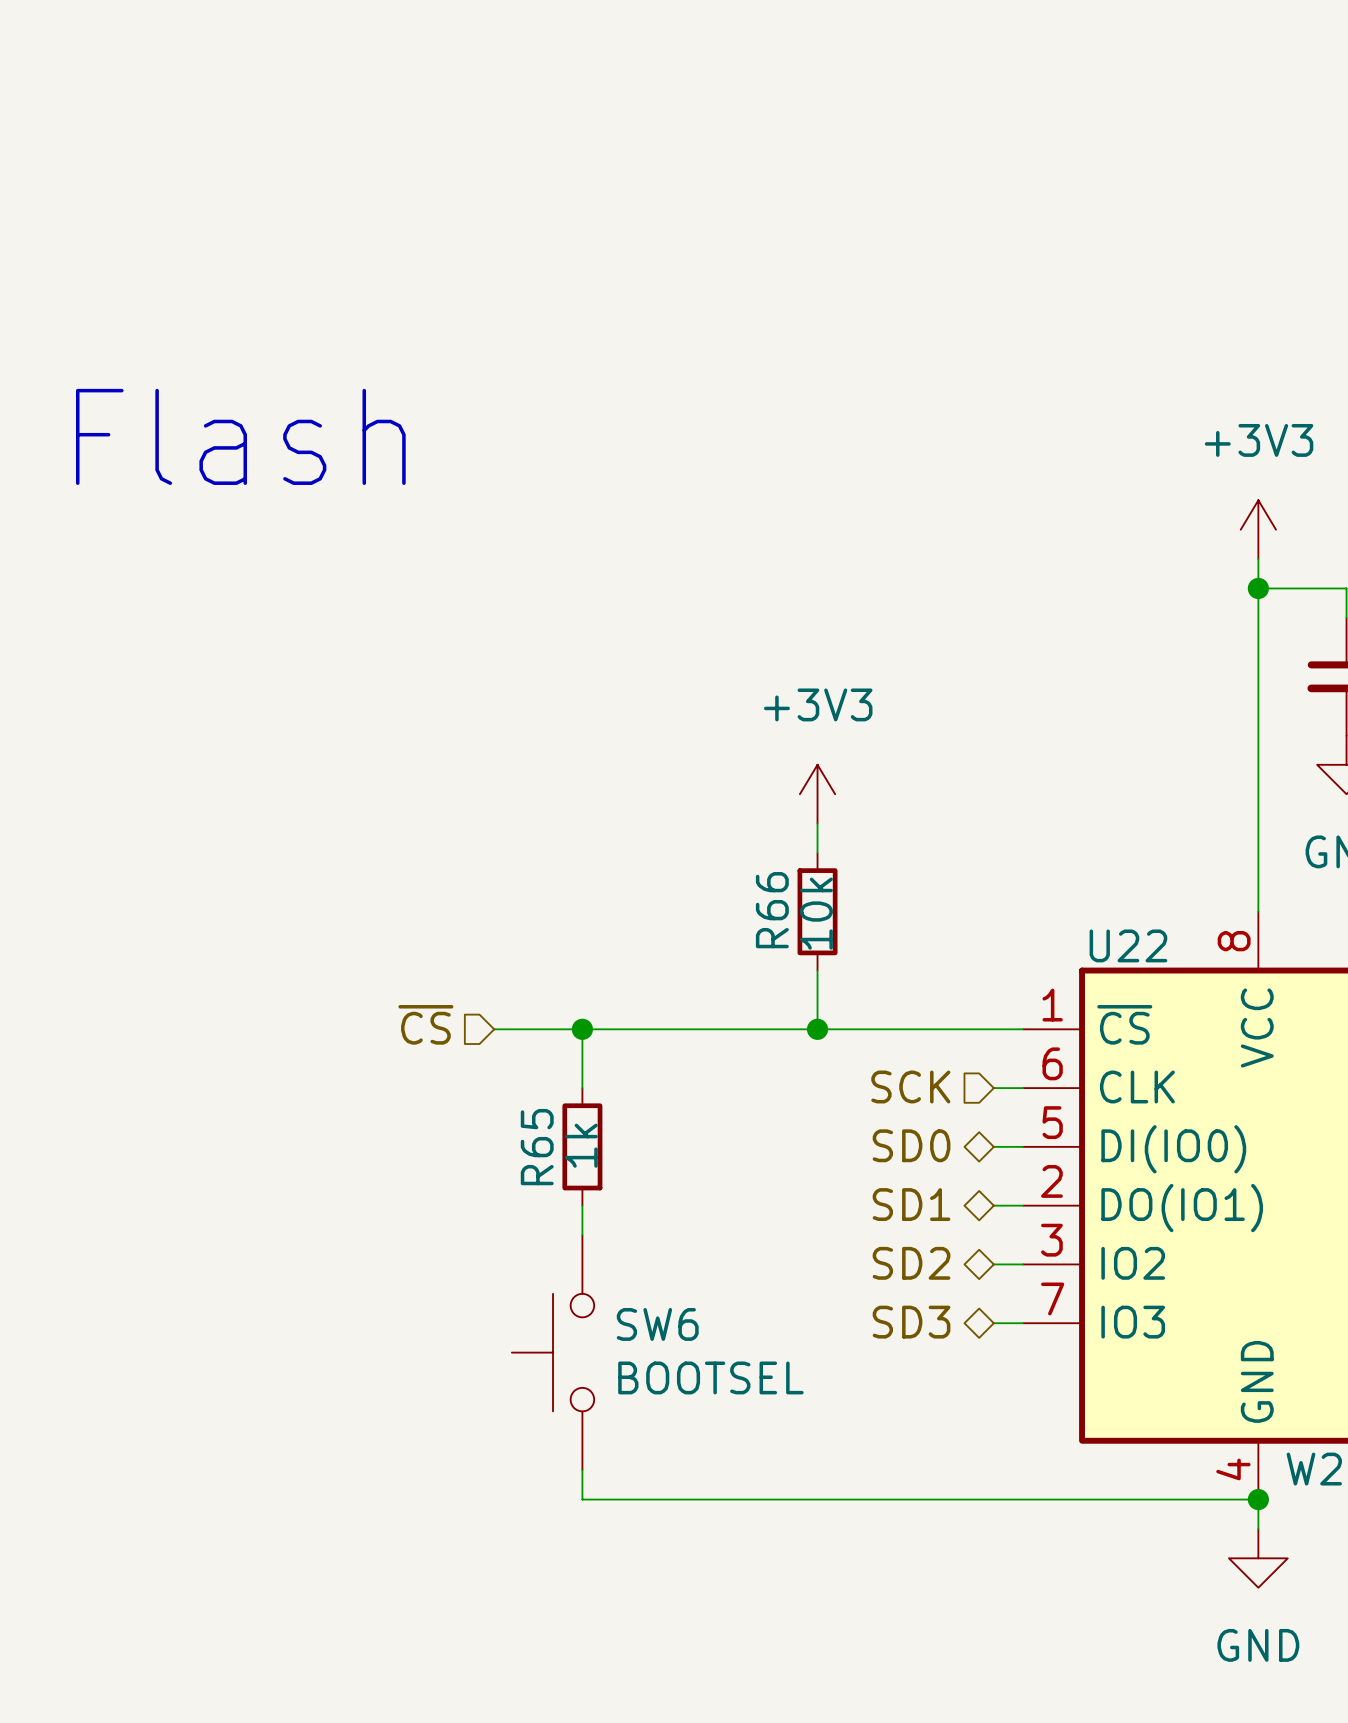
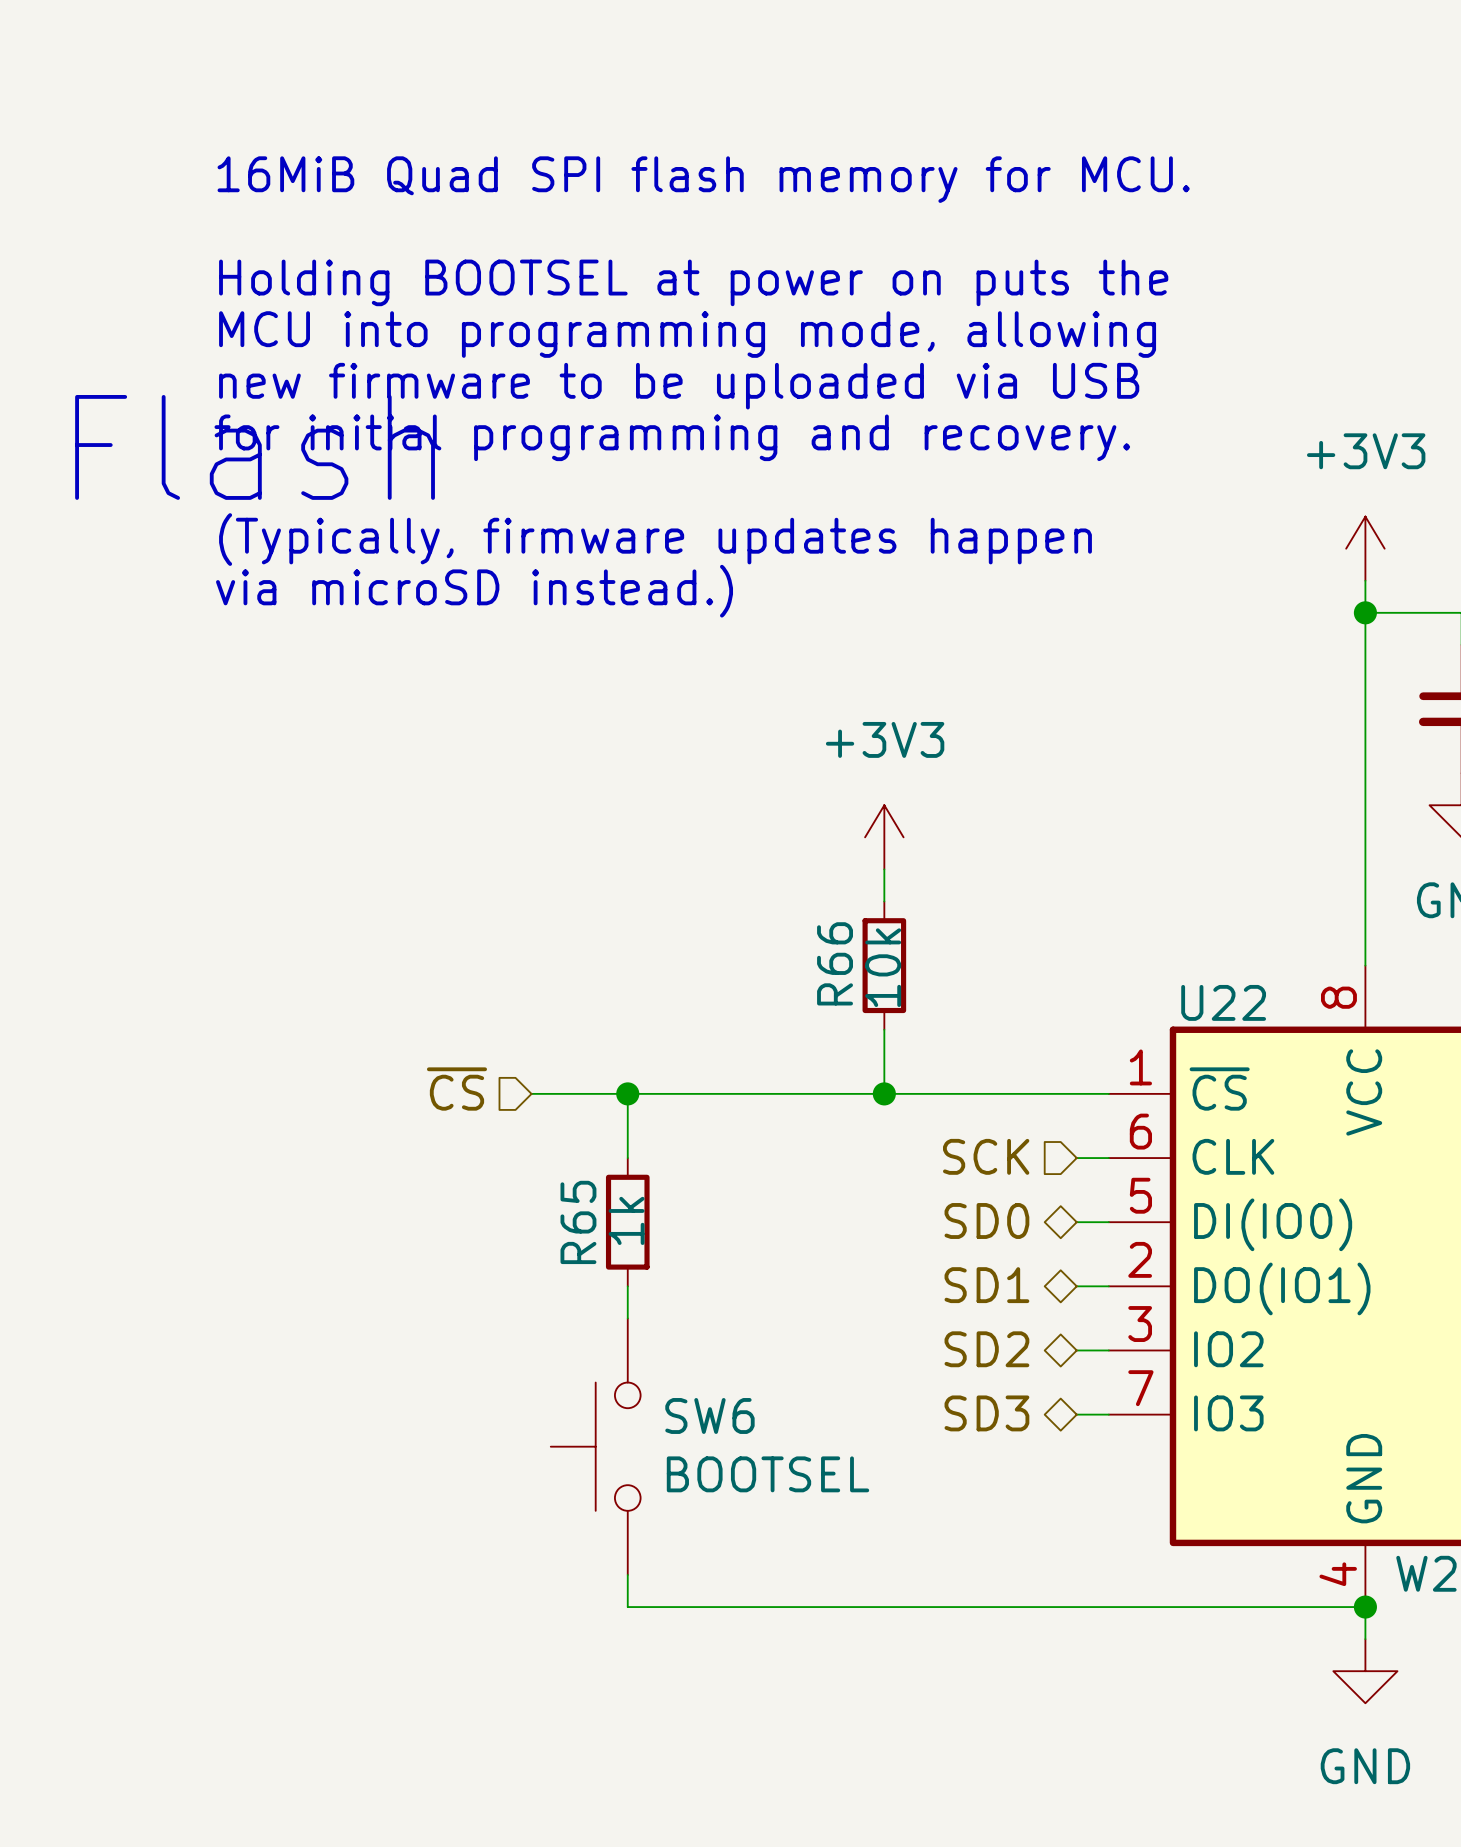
text: none -> 16MiB Quad SPI flash memory for MCU. (703, 179)
text: none -> Holding BOOTSEL at power on puts the (693, 282)
text: none -> MCU into programming mode, allowing (687, 334)
text: none -> new firmware to be uploaded via USB (679, 386)
text: none -> for initial programming and recovery. (672, 437)
text: none -> (Typically, firmware updates happen (655, 539)
text: none -> via microSD instead.) (474, 591)

